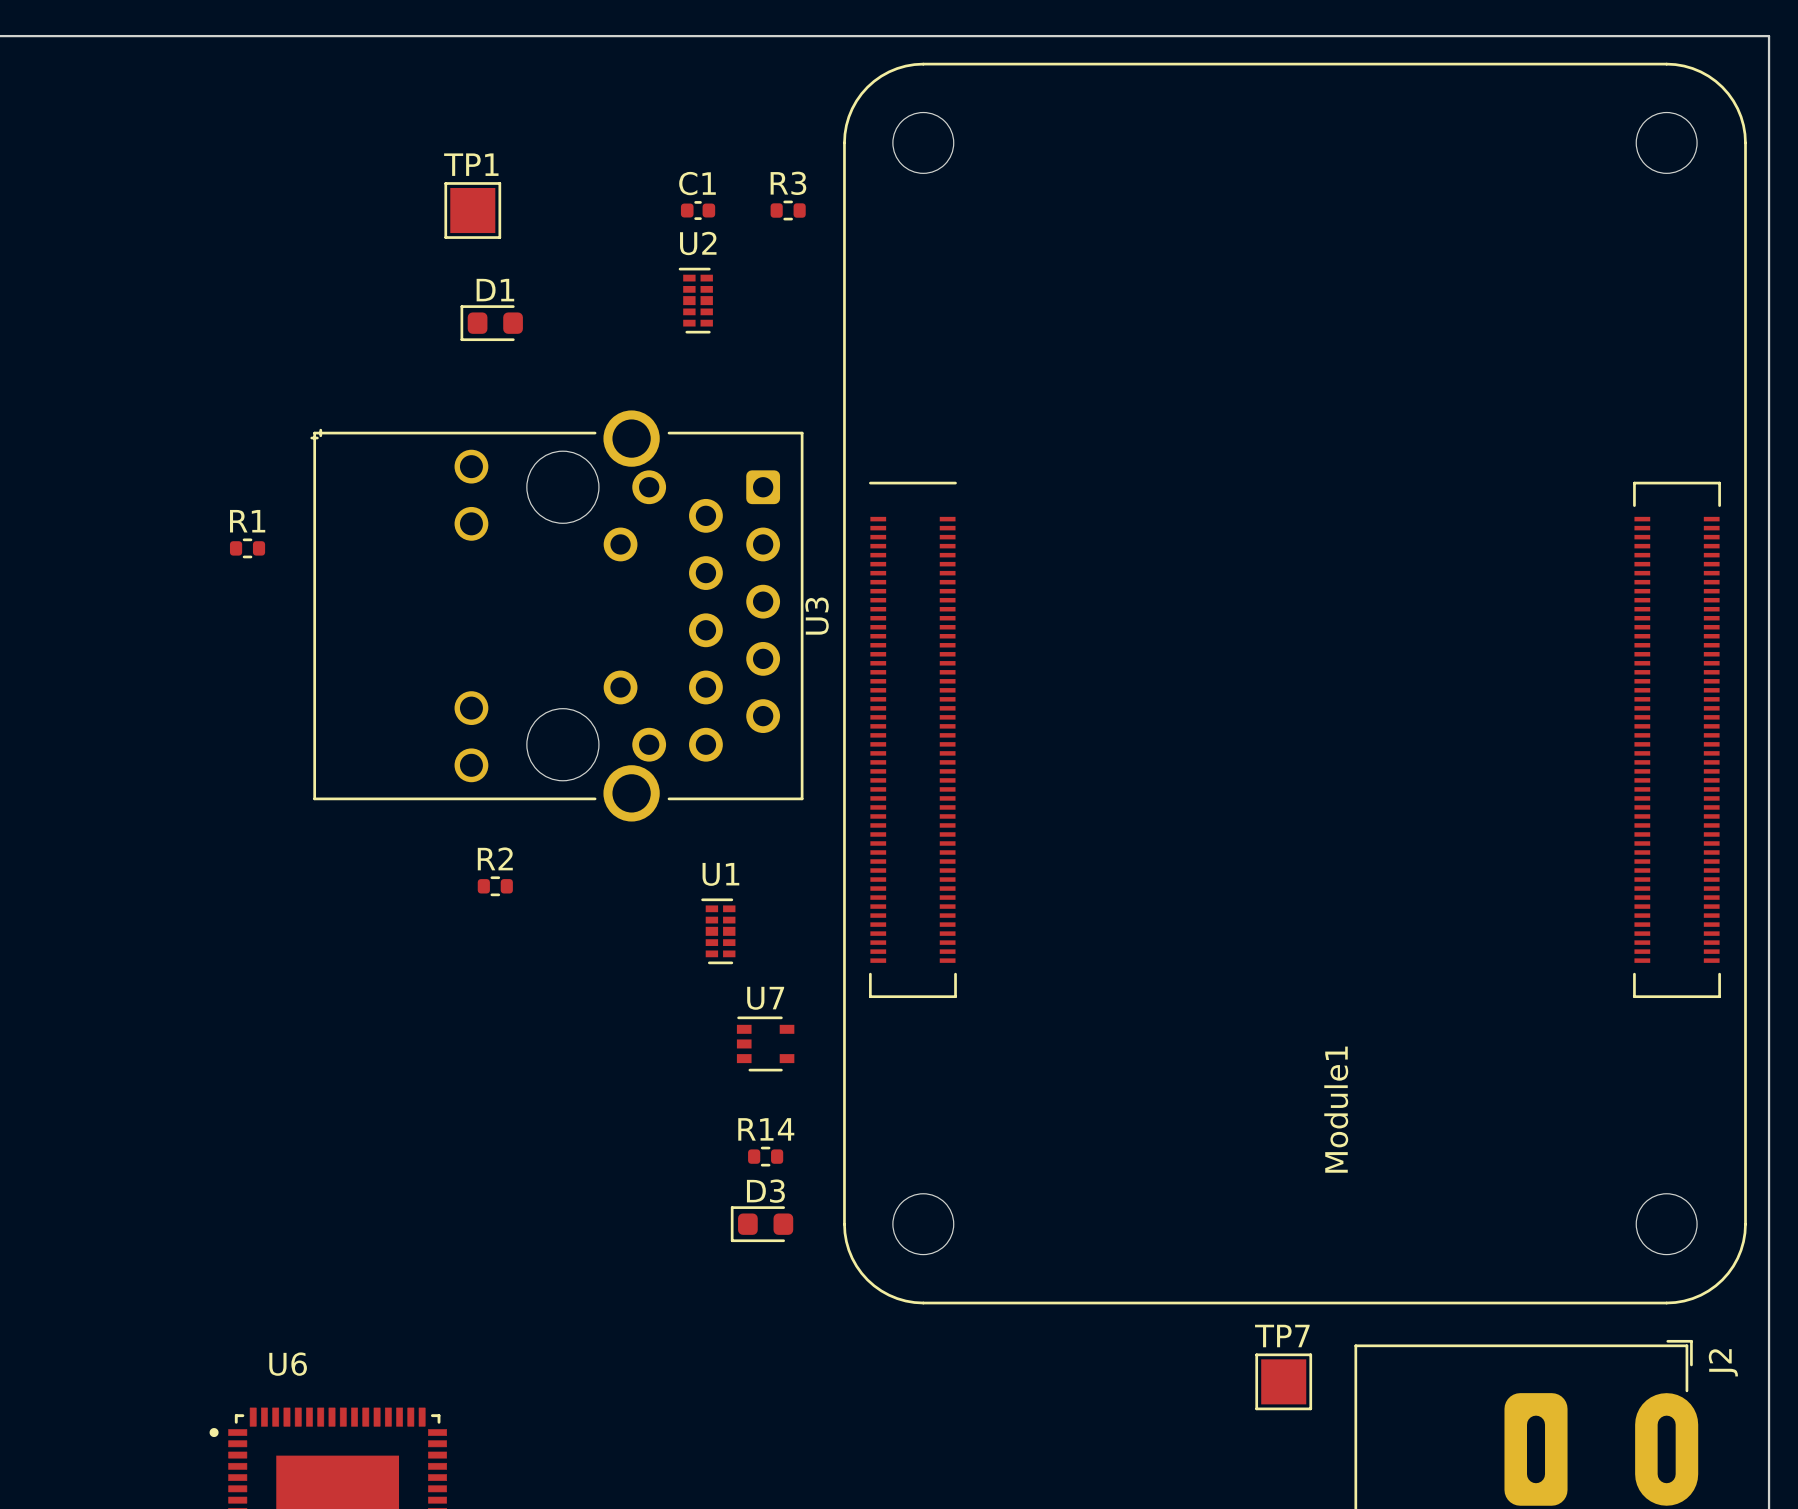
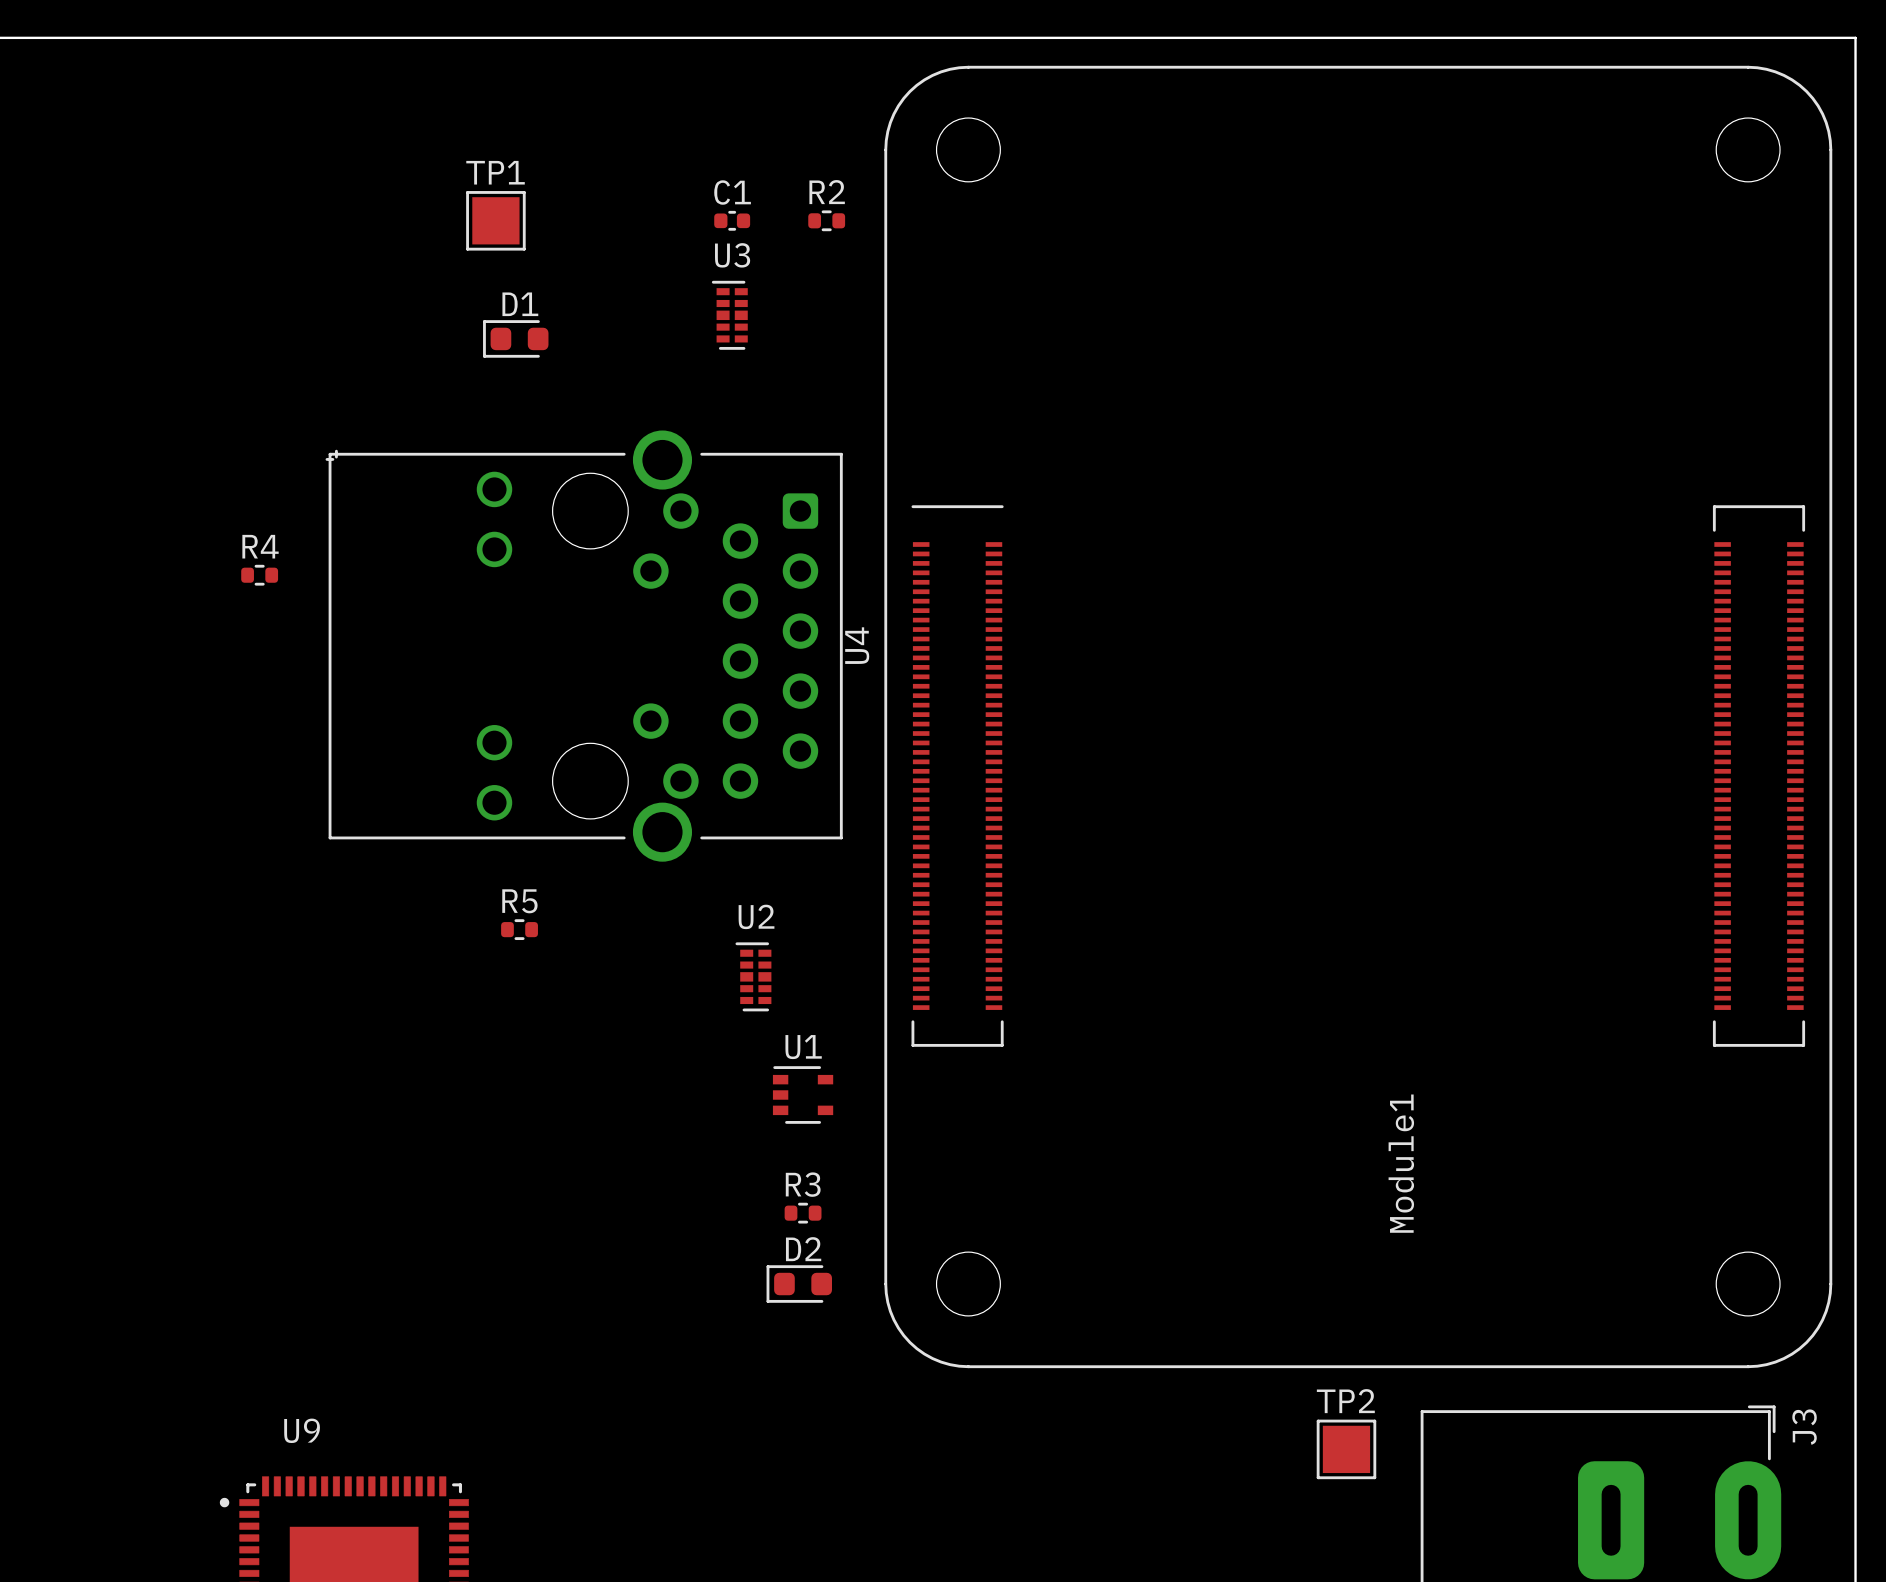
R3 name: R3 (788, 183) -> R2 (827, 192)
U2 name: U2 (698, 243) -> U3 (732, 255)
R1 name: R1 (247, 521) -> R4 (260, 546)
U3 name: U3 (817, 616) -> U4 (857, 645)
R2 name: R2 (495, 858) -> R5 (519, 901)
U1 name: U1 (720, 874) -> U2 (756, 916)
U7 name: U7 (765, 998) -> U1 (803, 1047)
R14 name: R14 (766, 1129) -> R3 (803, 1184)
D3 name: D3 (765, 1191) -> D2 (803, 1249)
TP7 name: TP7 (1282, 1336) -> TP2 (1345, 1401)
J2 name: J2 (1723, 1362) -> J3 (1804, 1427)
U6 name: U6 (288, 1364) -> U9 (302, 1430)

